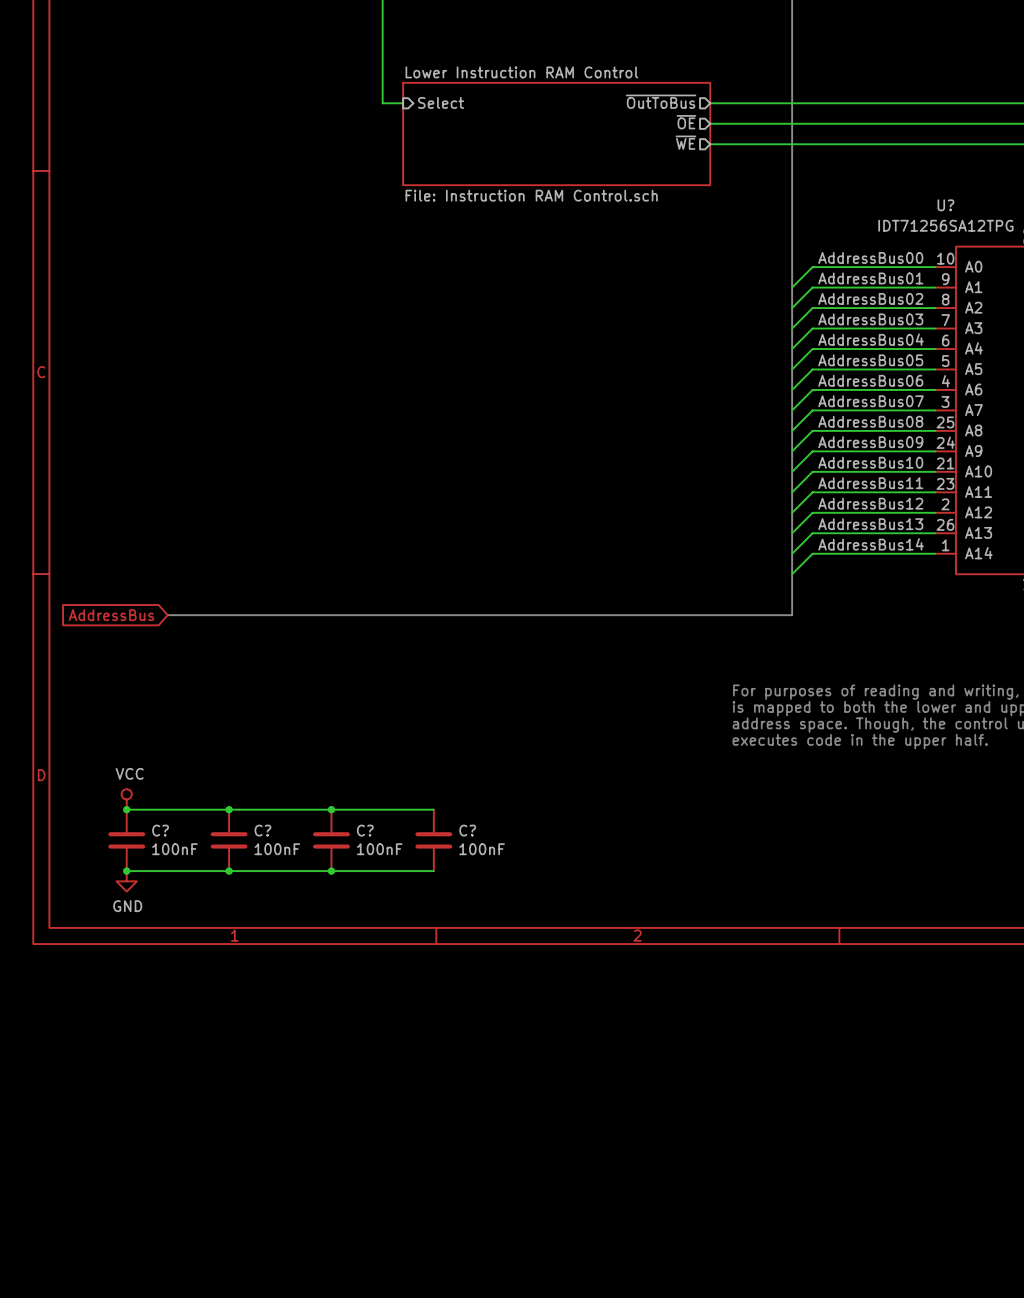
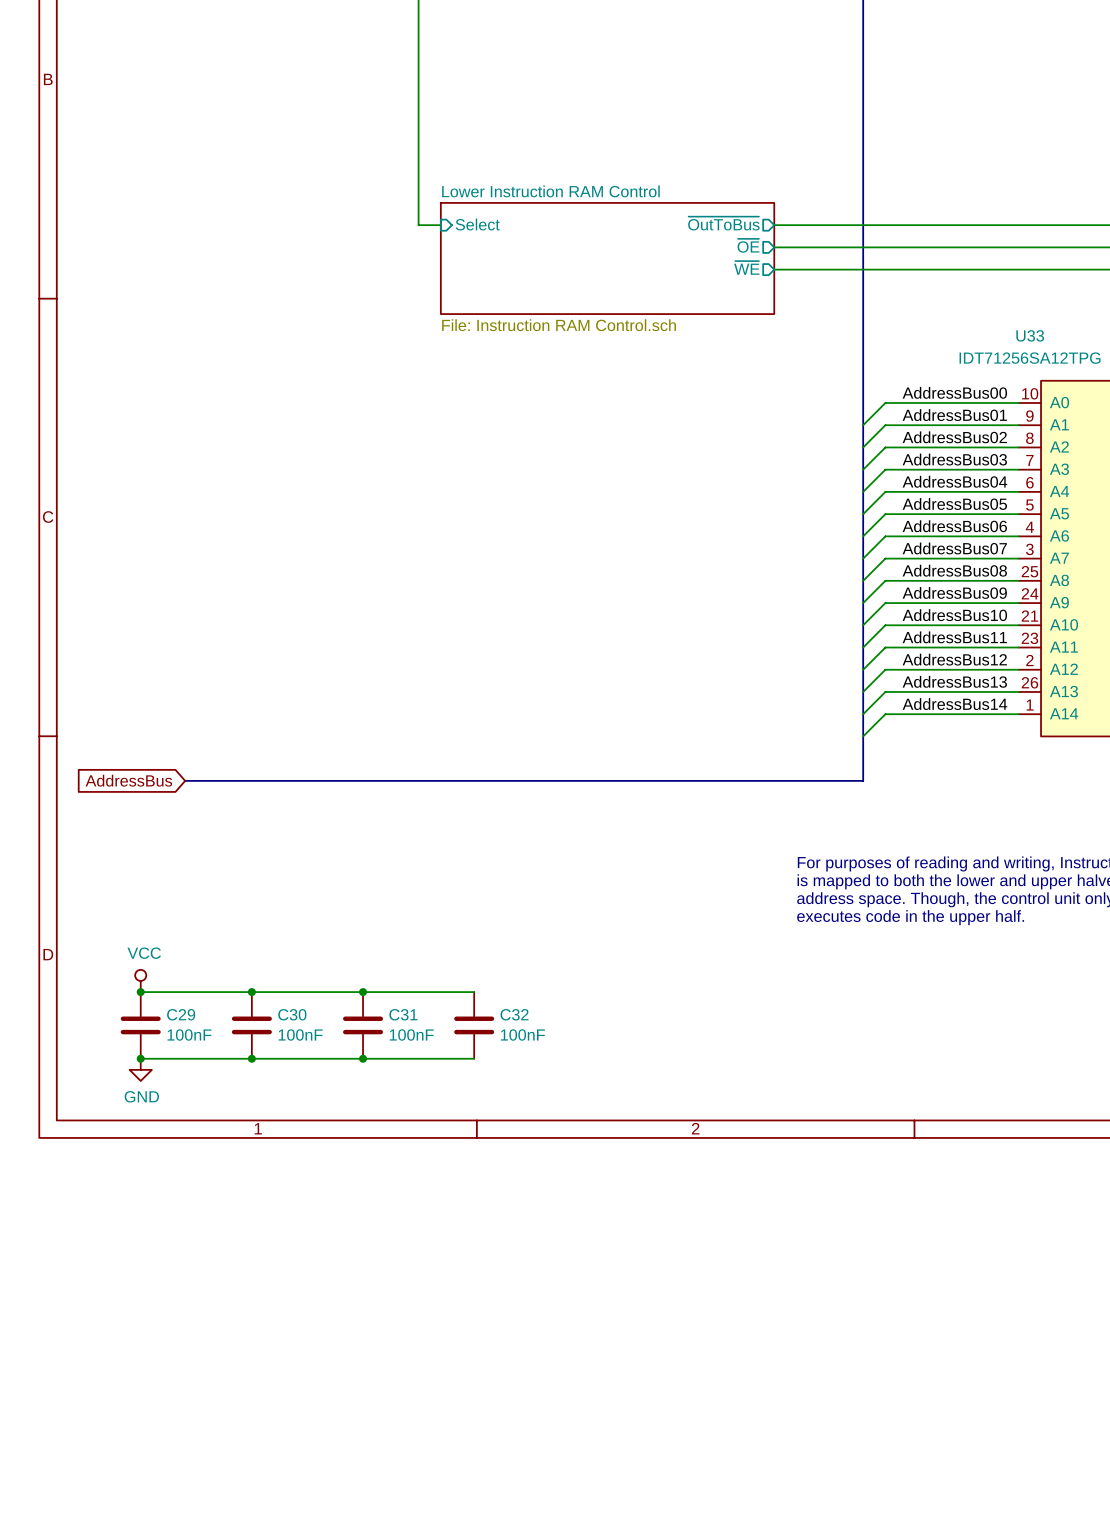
U? name: U? (945, 205) -> U33 (1030, 335)
C? name: C? (160, 830) -> C29 (181, 1014)
C? name: C? (262, 830) -> C30 (292, 1014)
C? name: C? (365, 830) -> C31 (403, 1014)
C? name: C? (467, 830) -> C32 (514, 1014)

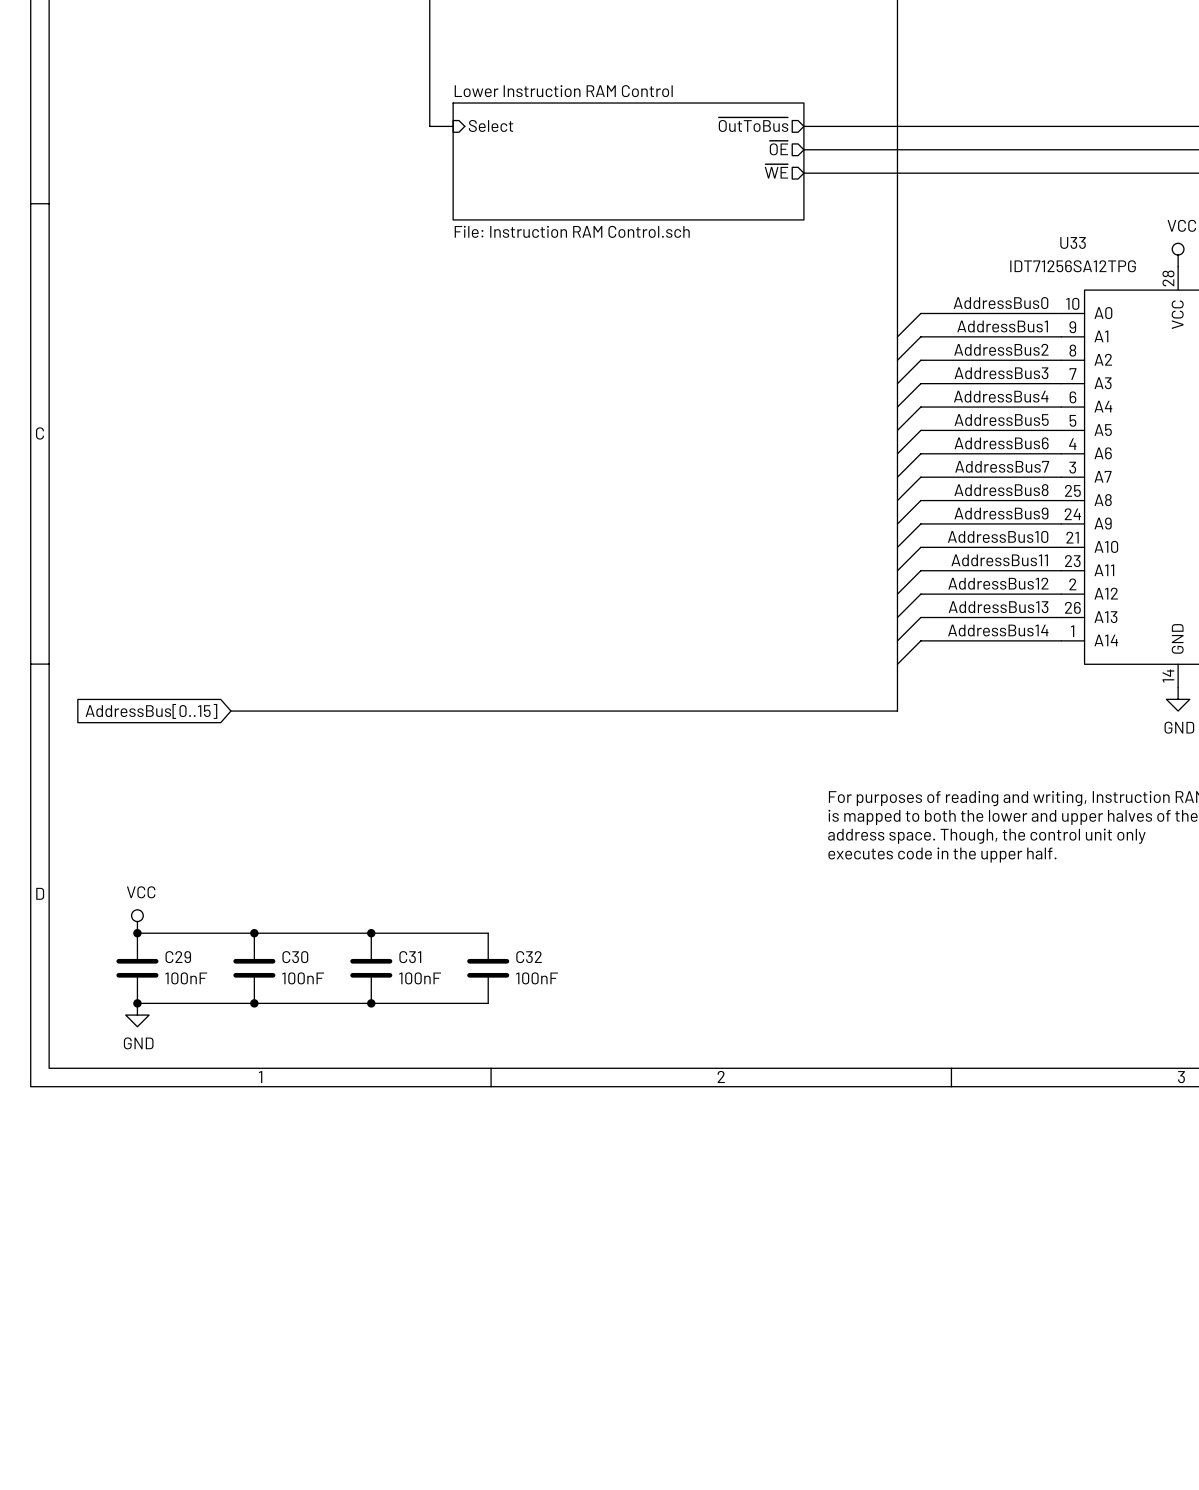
label: AddressBus00 (954, 392) -> AddressBus0 (1000, 303)
label: AddressBus01 (954, 415) -> AddressBus1 (1002, 326)
label: AddressBus02 (954, 437) -> AddressBus2 (1001, 349)
label: AddressBus03 (954, 459) -> AddressBus3 (1001, 373)
label: AddressBus04 (954, 481) -> AddressBus4 (1001, 396)
label: AddressBus05 (954, 504) -> AddressBus5 (1001, 420)
label: AddressBus06 (954, 526) -> AddressBus6 (1001, 443)
label: AddressBus07 (954, 548) -> AddressBus7 (1002, 466)
label: AddressBus08 (954, 570) -> AddressBus8 (1001, 490)
label: AddressBus09 (954, 592) -> AddressBus9 (1001, 513)
global label: AddressBus (128, 780) -> AddressBus[0..15] (151, 711)
bus: (185, 780) (229, 780) -> none

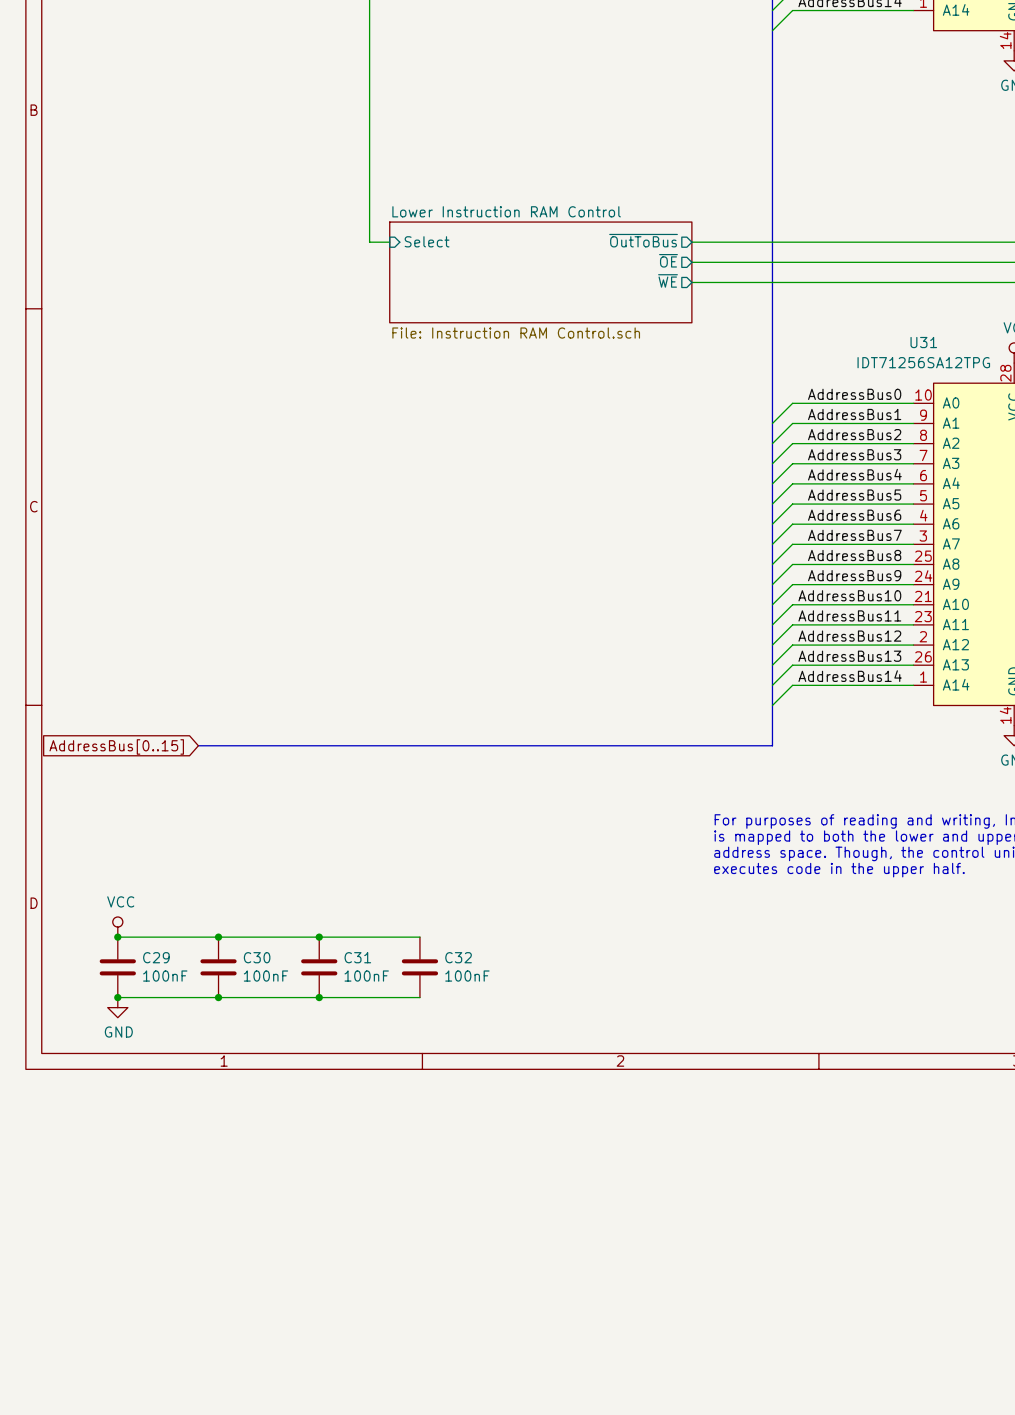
U33 name: U33 (1073, 242) -> U31 (923, 342)

